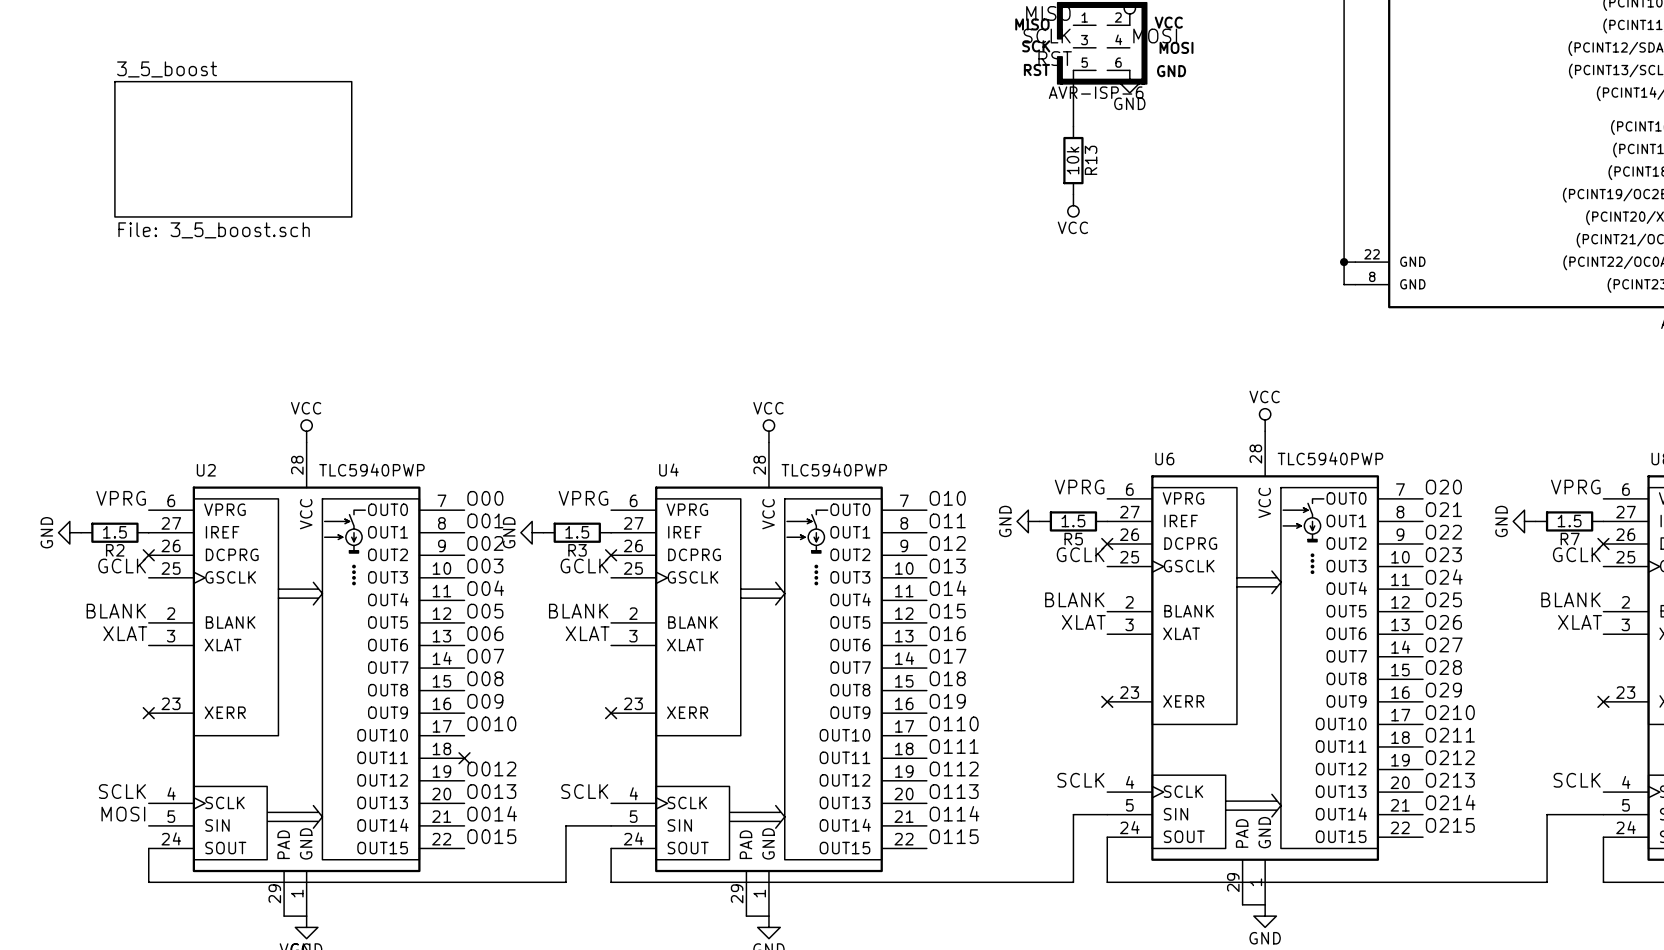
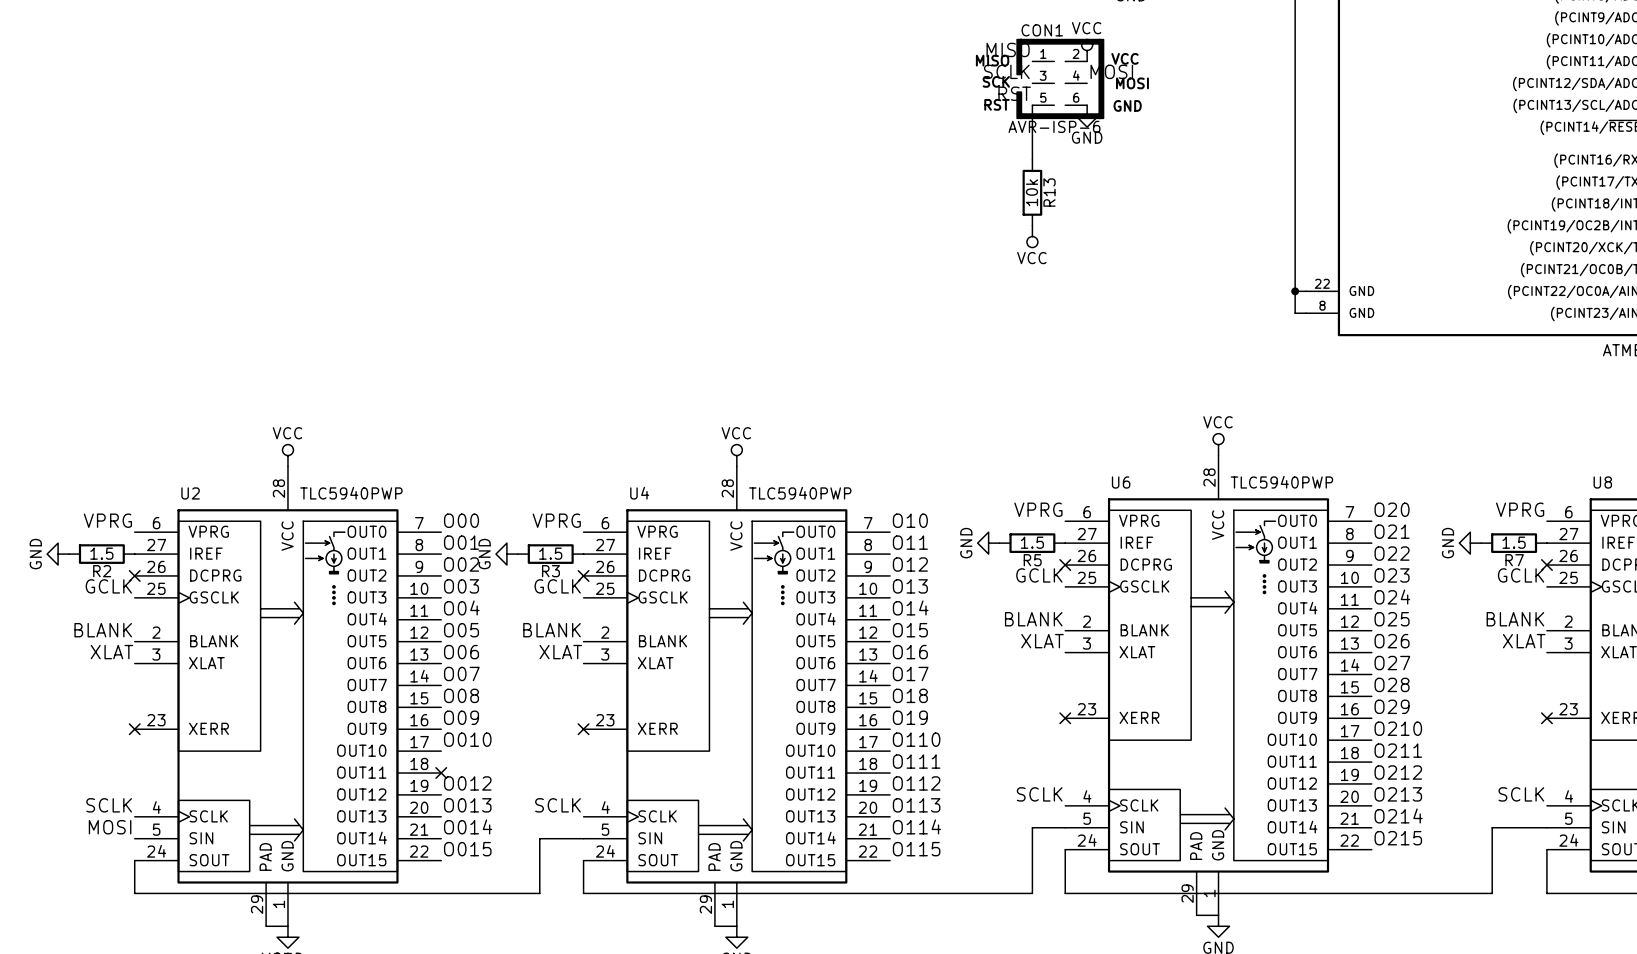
sheet 3_5_boost: File: 3_5_boost.sch (233, 149) -> none

